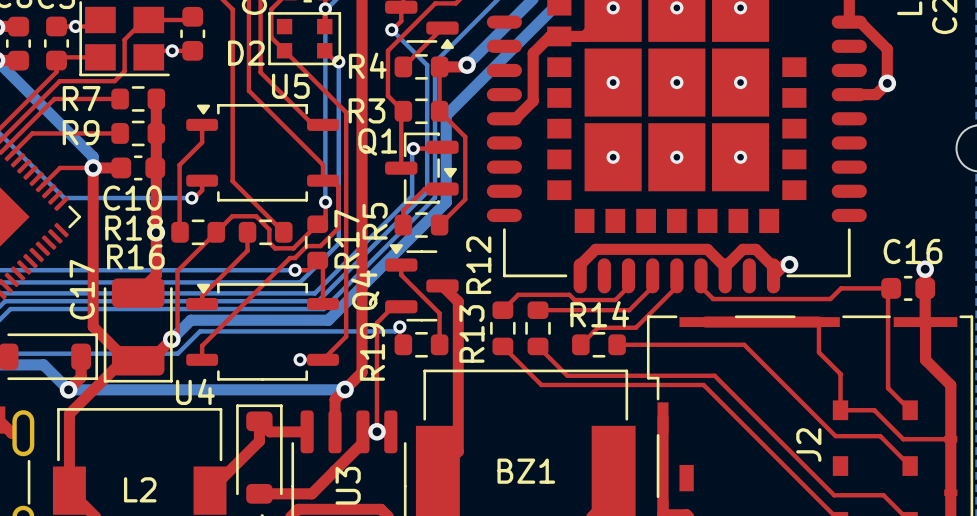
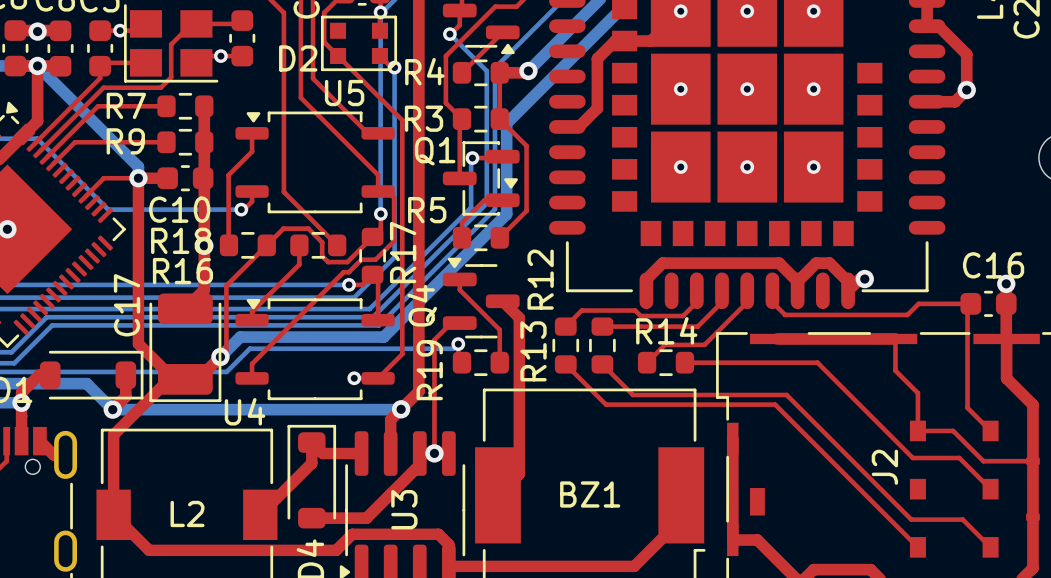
R5 name rotation: 0° (375, 221) -> 90° clockwise (427, 210)

